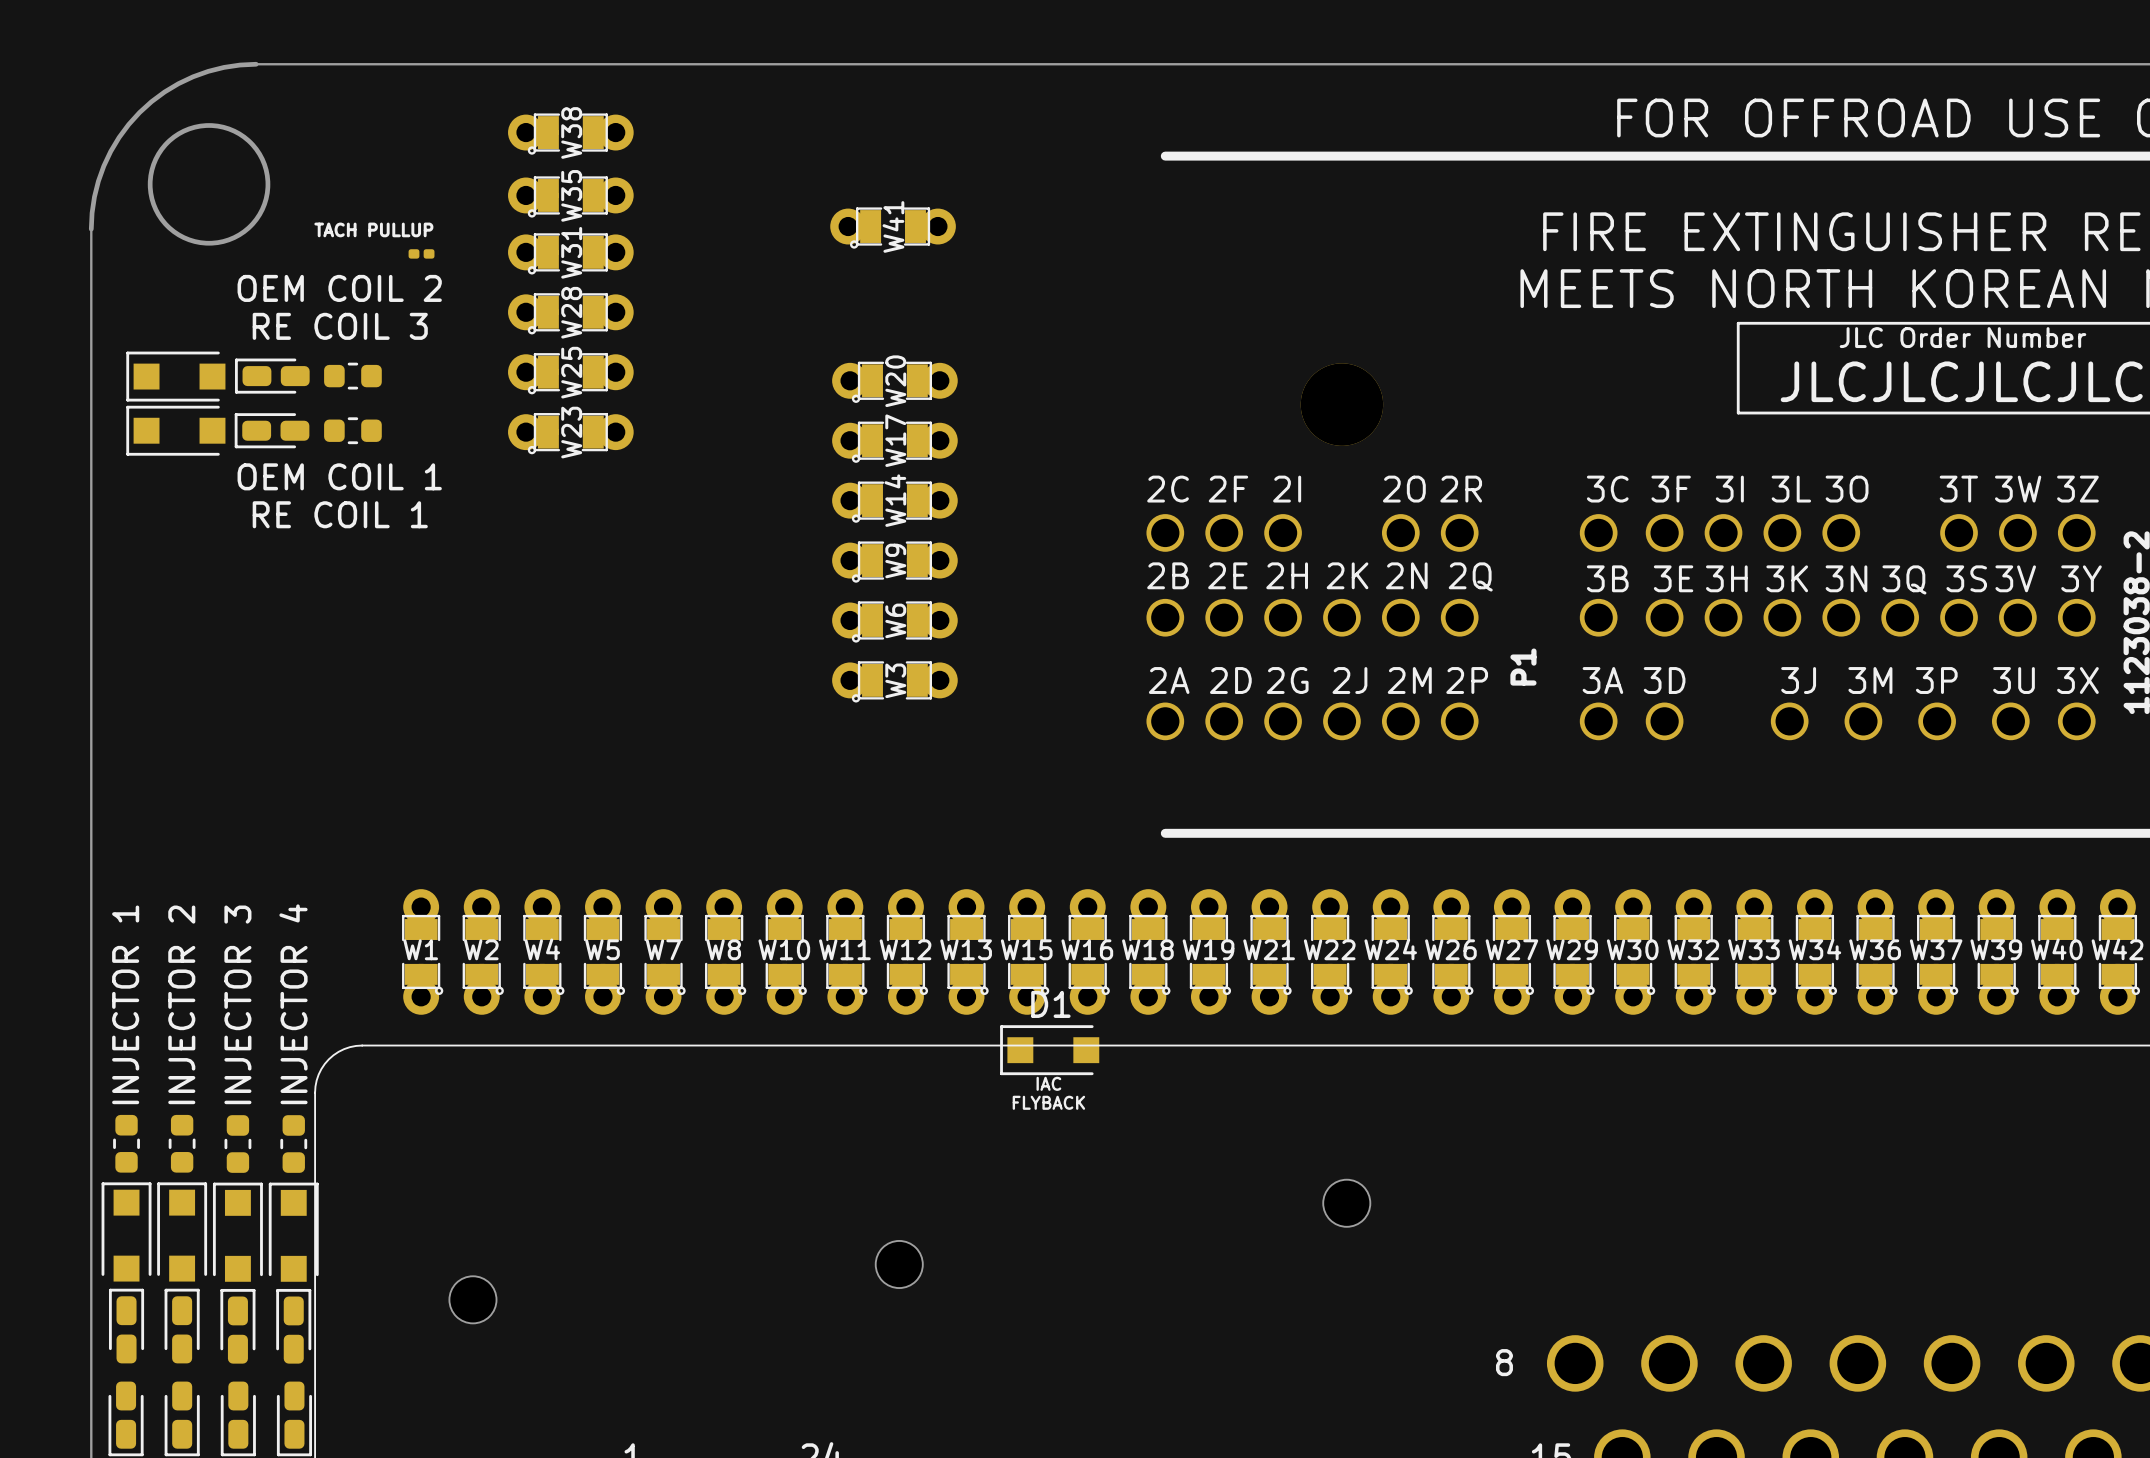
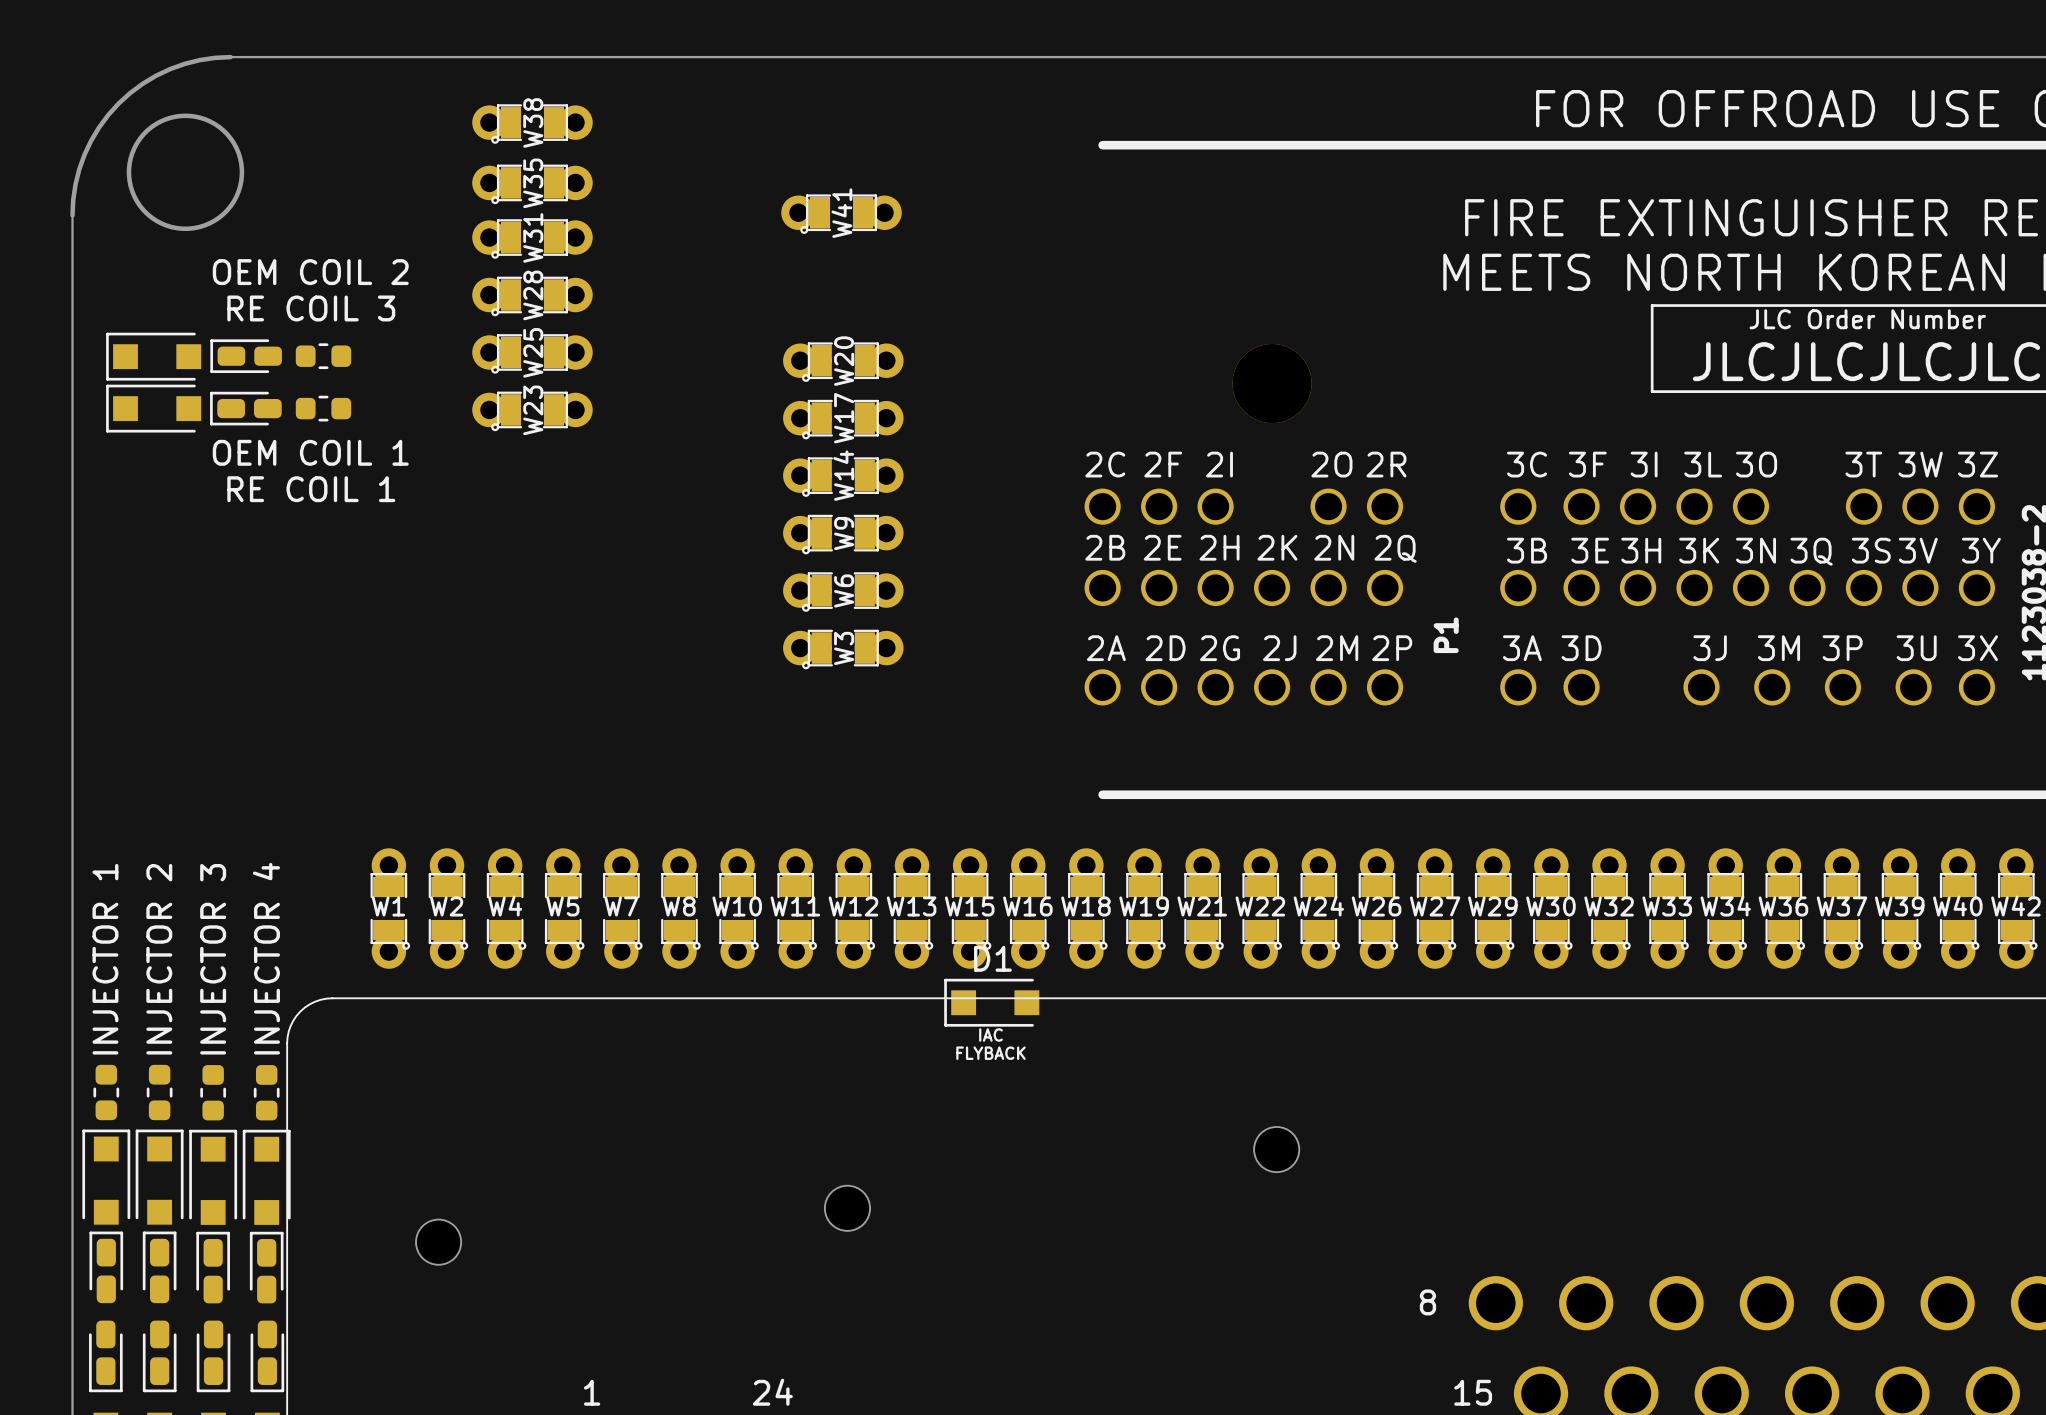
text: TACH PULLUP (373, 229) -> none
part: (421, 253) -> none

